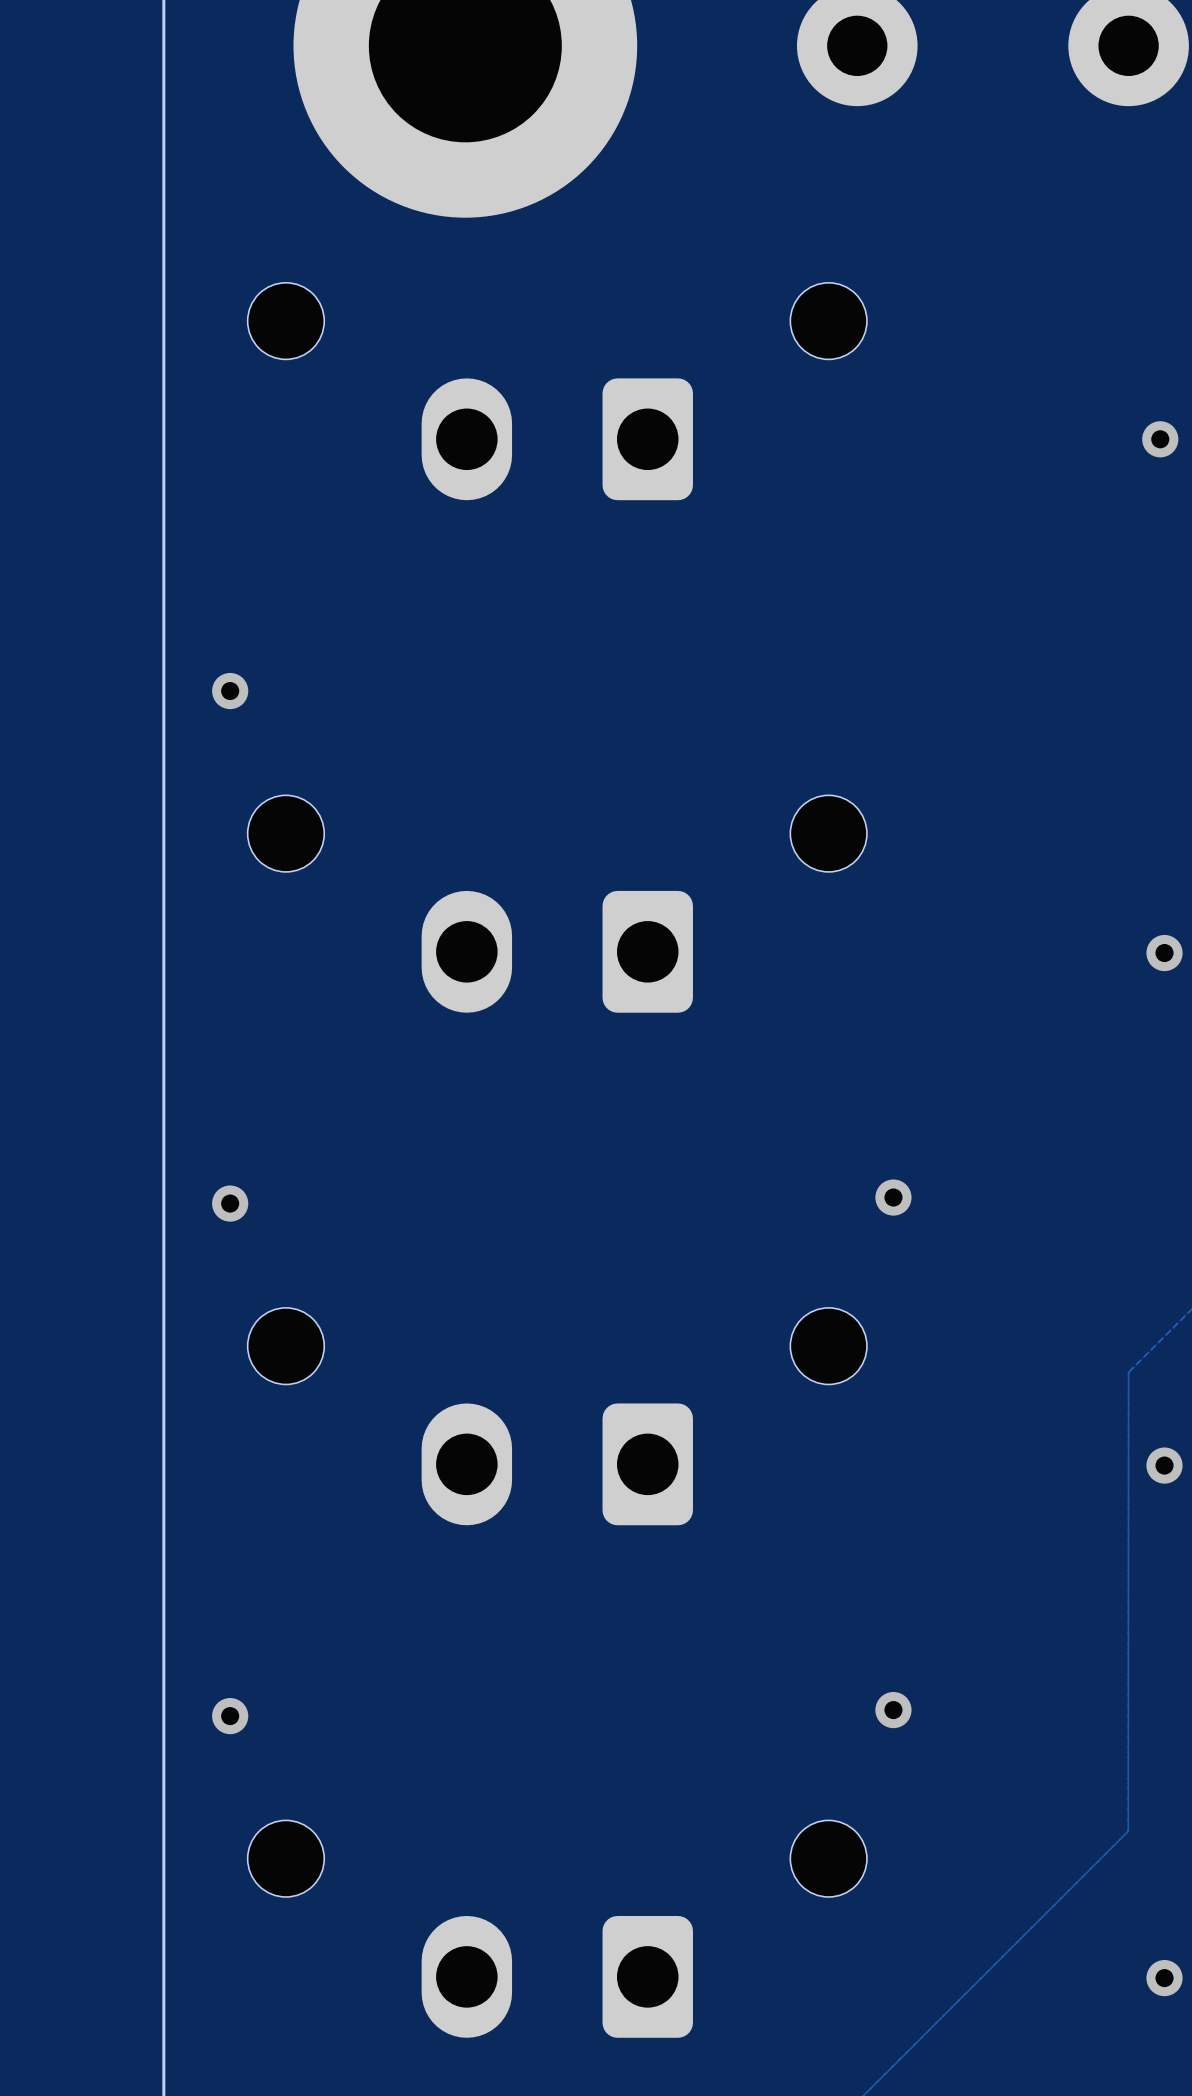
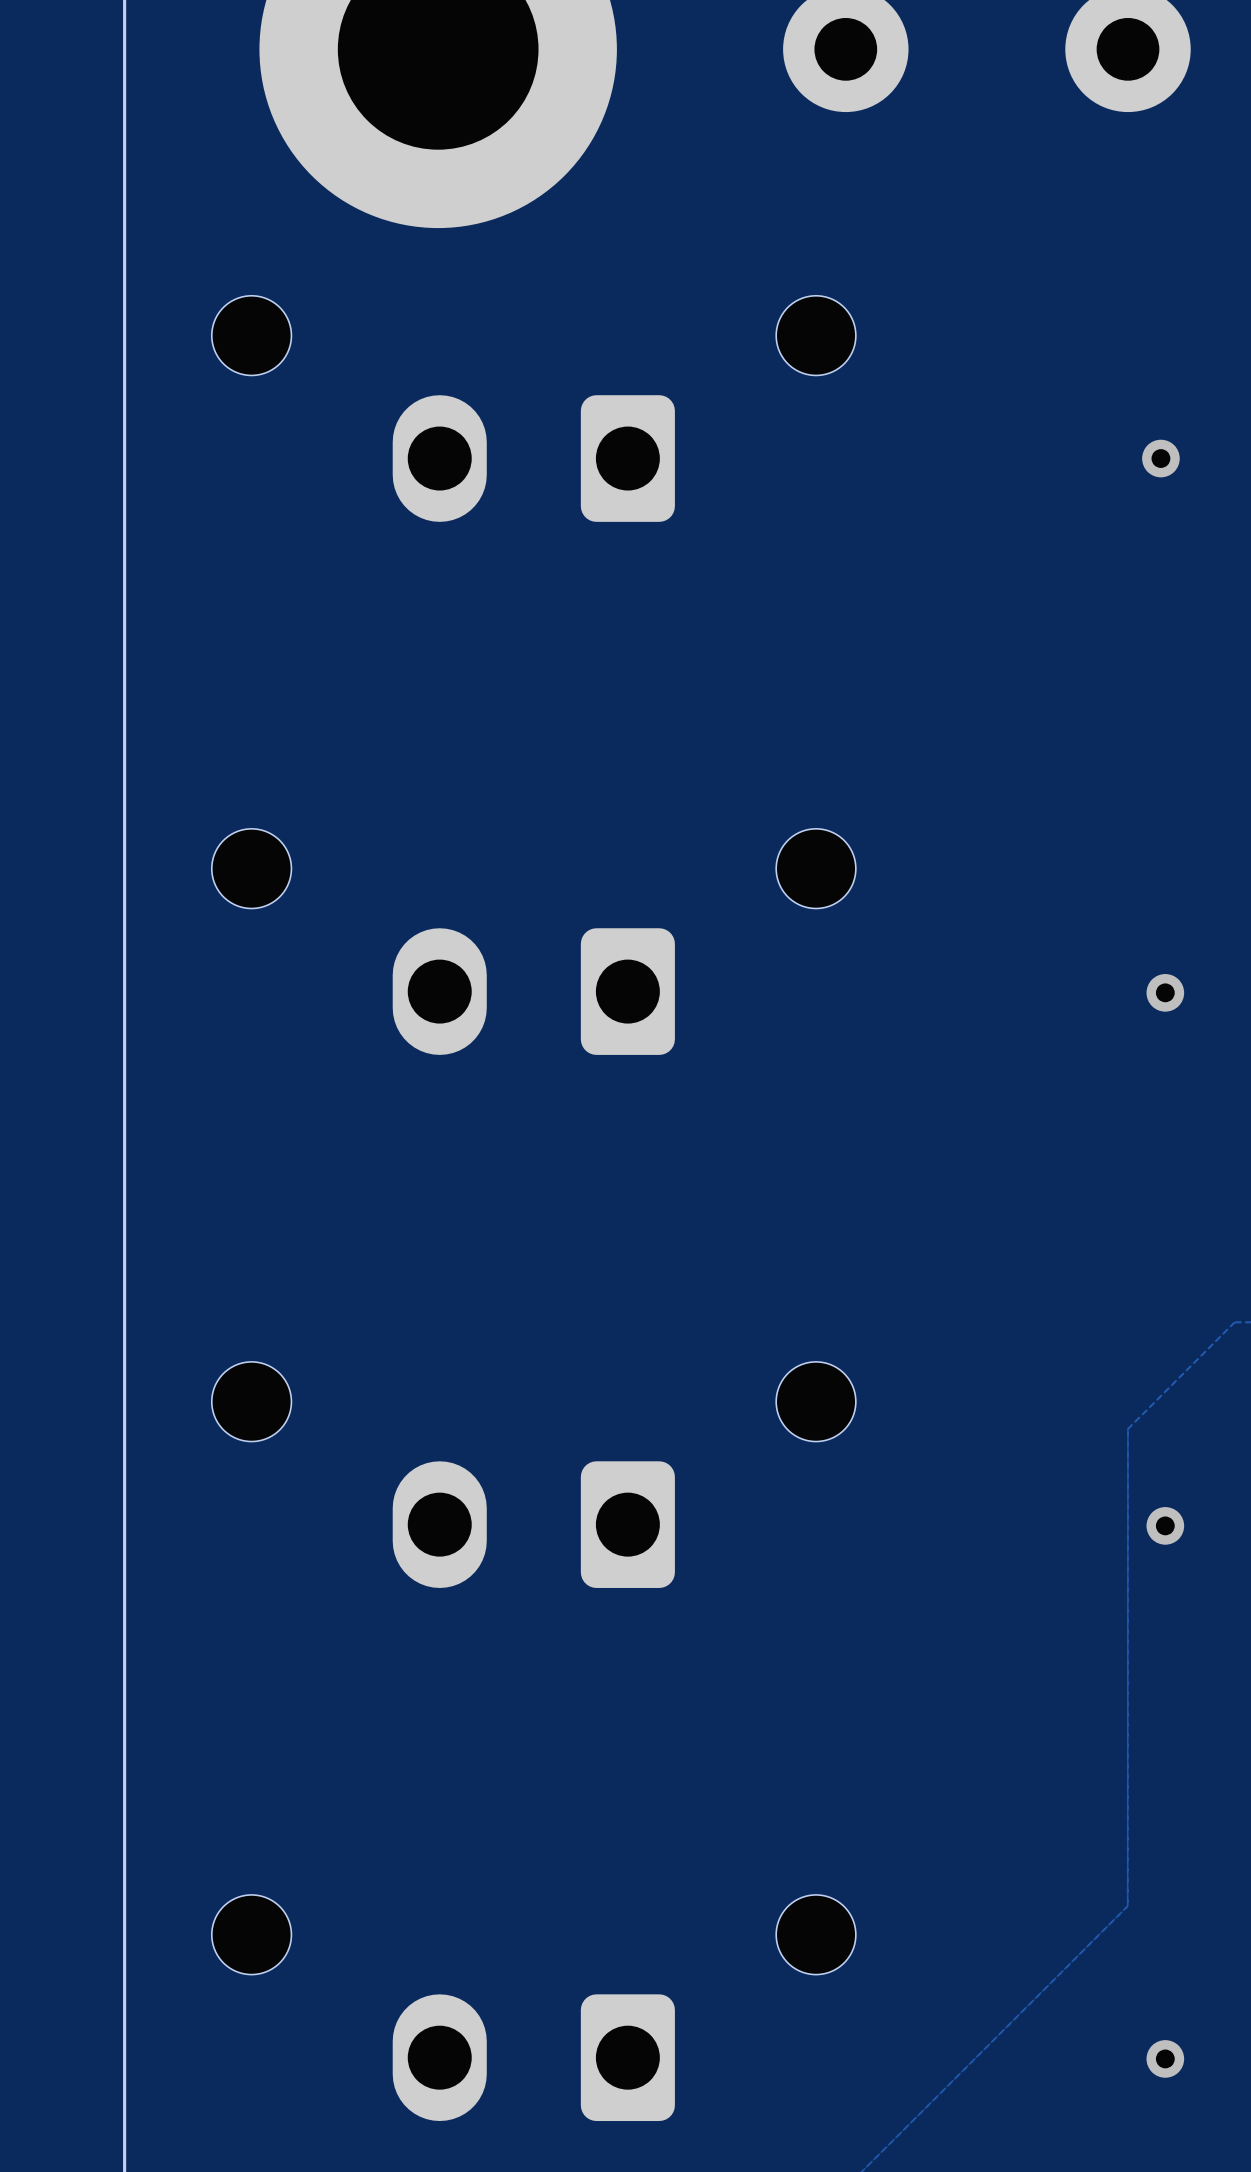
via: (230, 691) -> none
via: (893, 1197) -> none
via: (230, 1203) -> none
via: (893, 1710) -> none
via: (230, 1716) -> none

